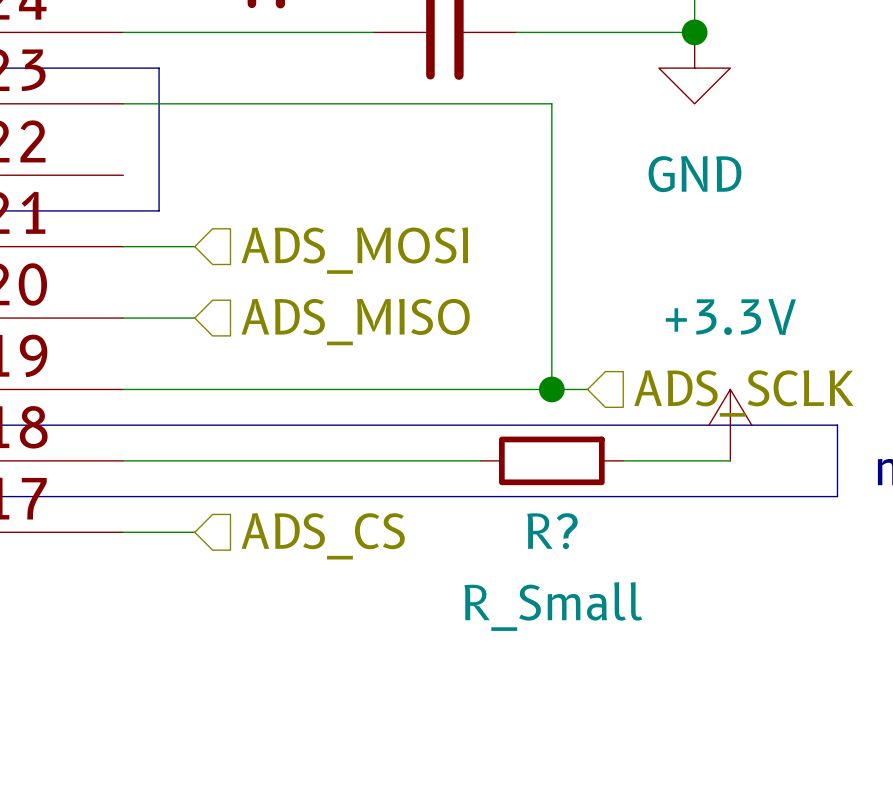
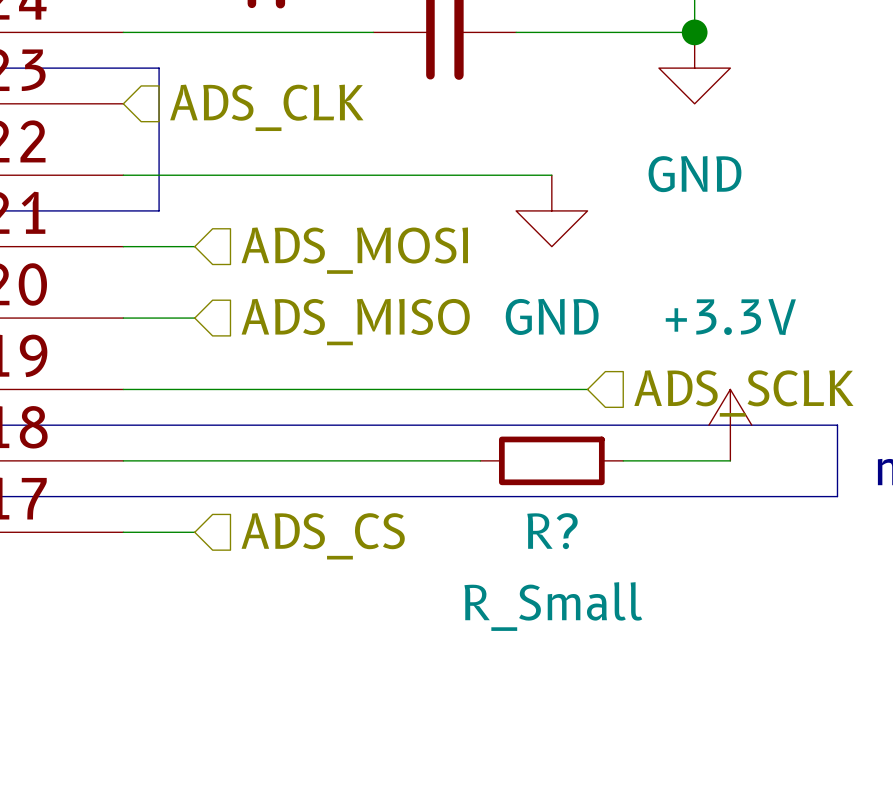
wire: (123, 103) (551, 103) (551, 389) -> none
hierarchical label: none -> ADS_CLK (266, 107)
wire: none -> (123, 175) (551, 175)
power symbol: none -> GND (551, 210)
junction: (551, 389) -> none

